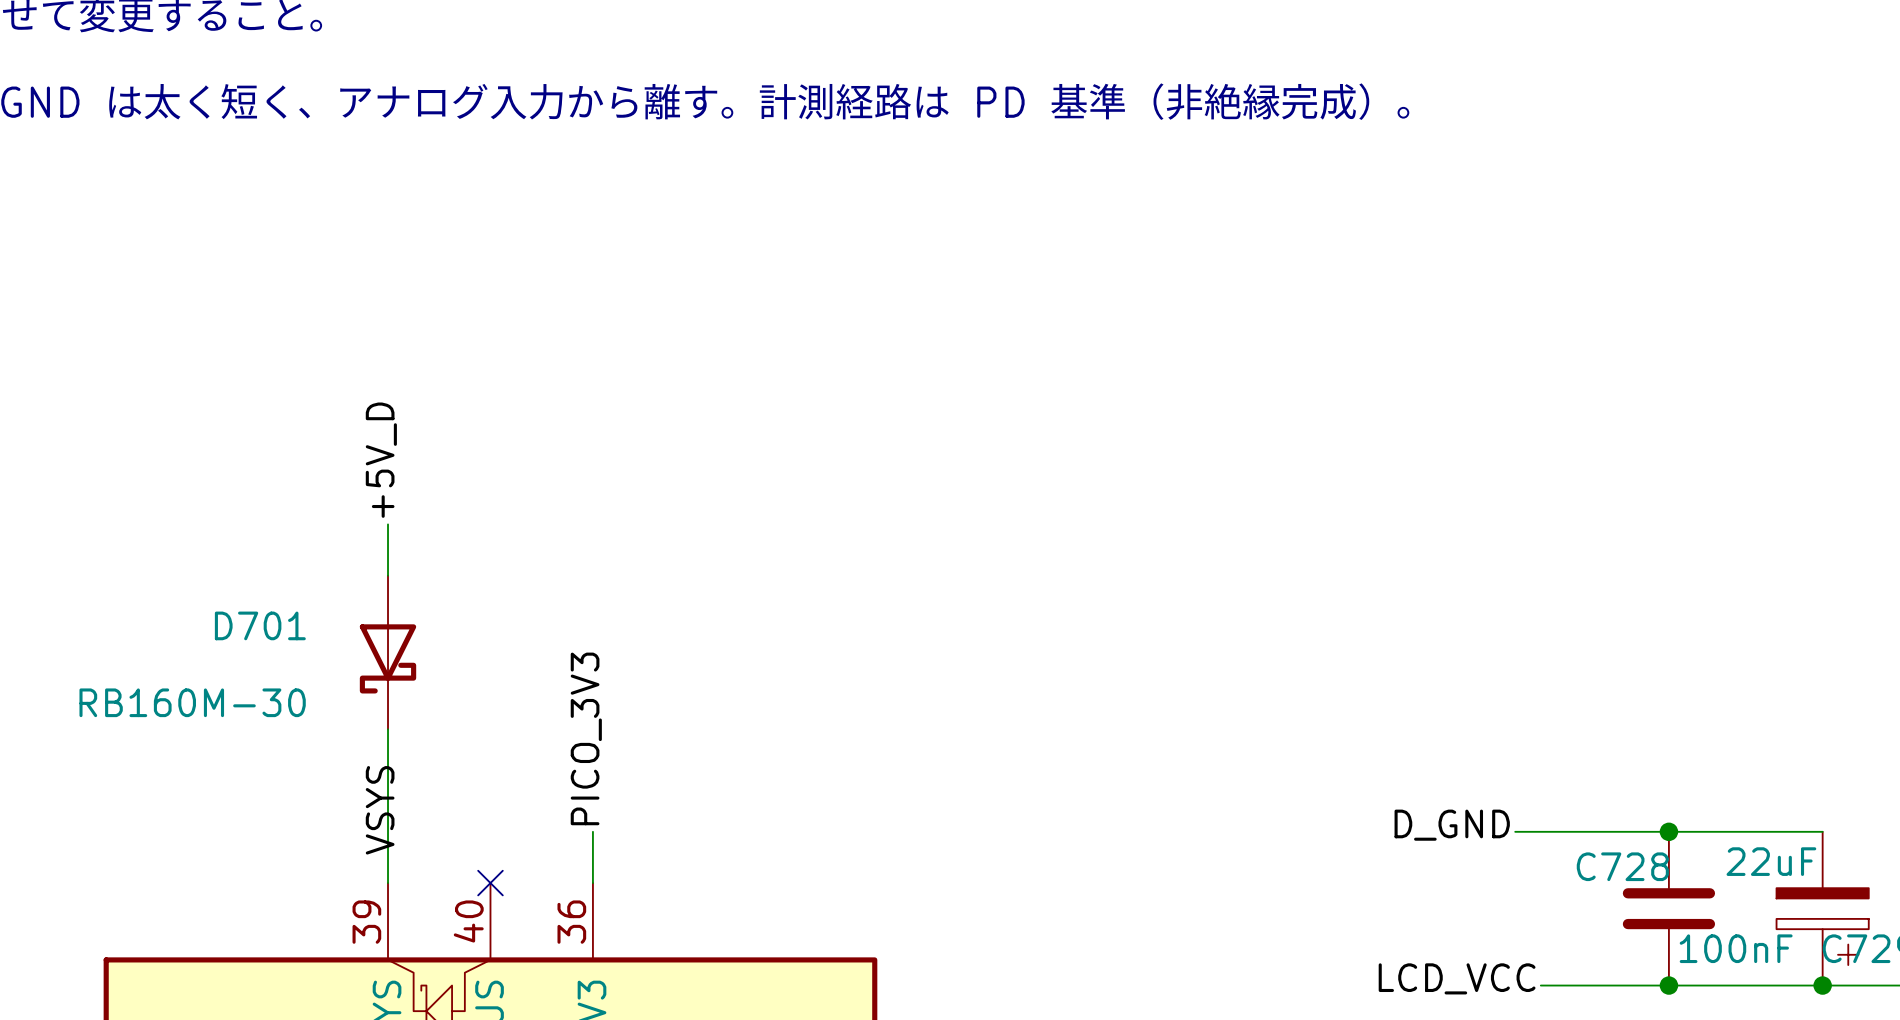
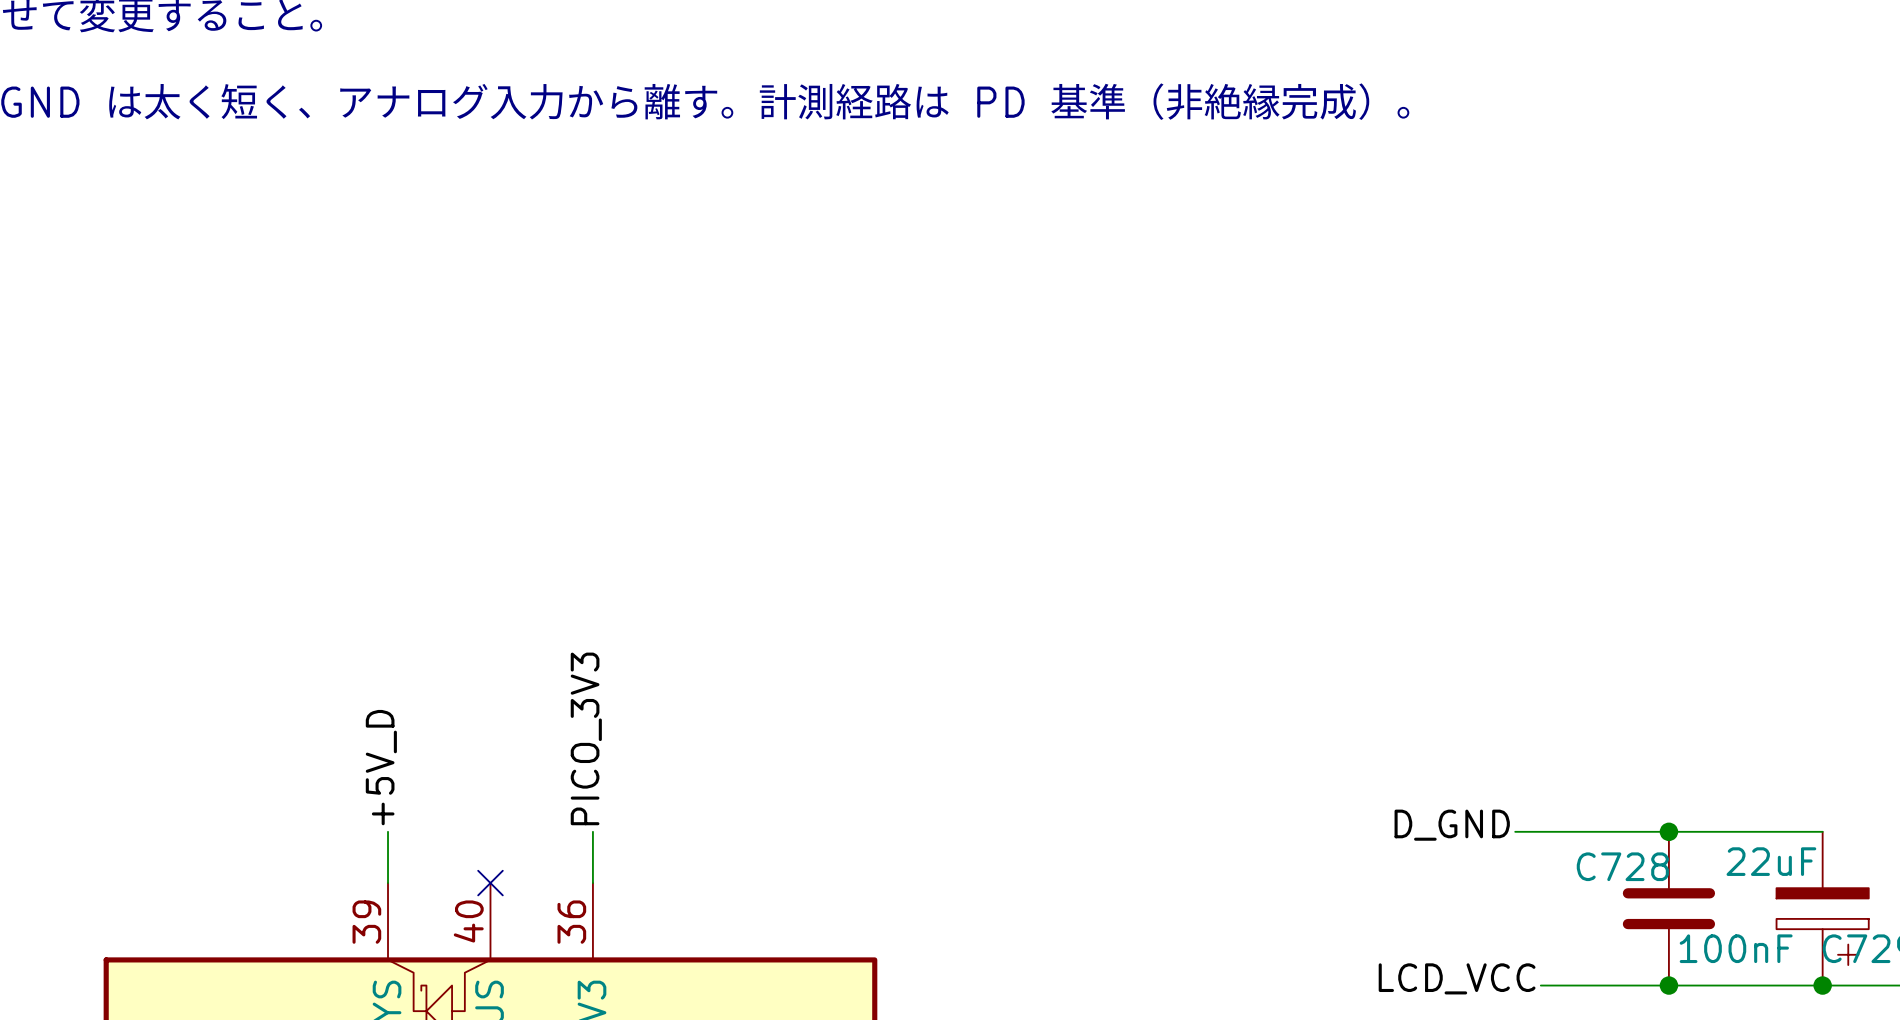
label position: +5V_D (381, 460) -> +5V_D (381, 767)
wire: (388, 524) (388, 575) -> none
D701: RB160M-30 (388, 652) -> none
wire: (388, 729) (388, 831) -> none
label: VSYS (380, 810) -> none

